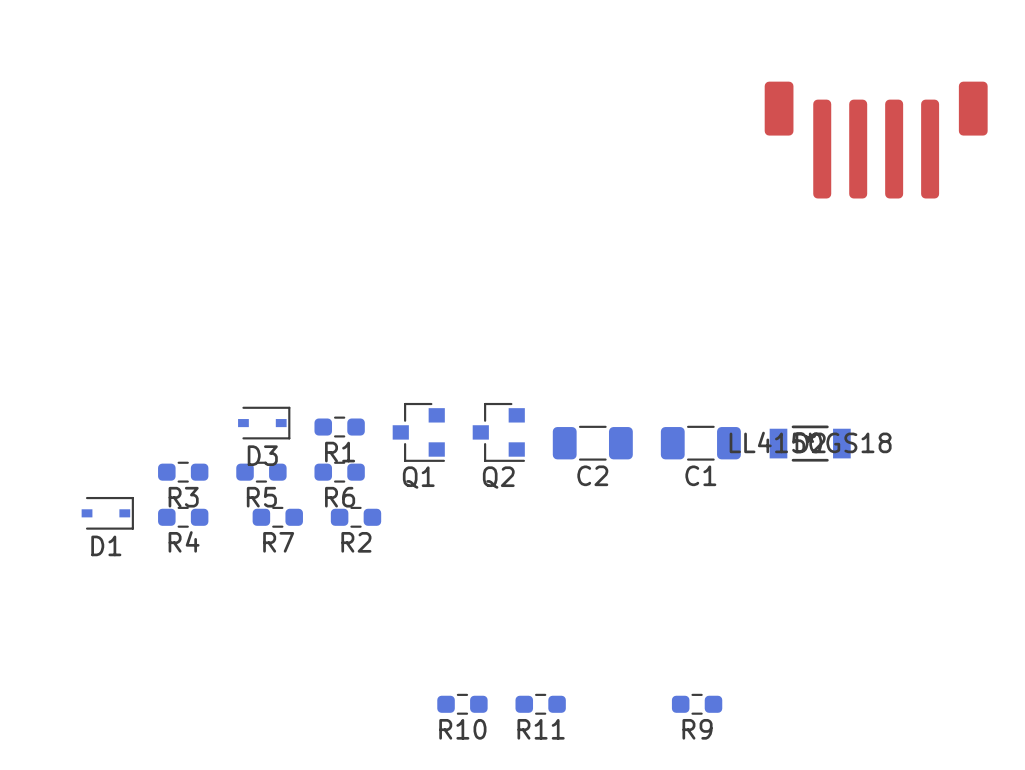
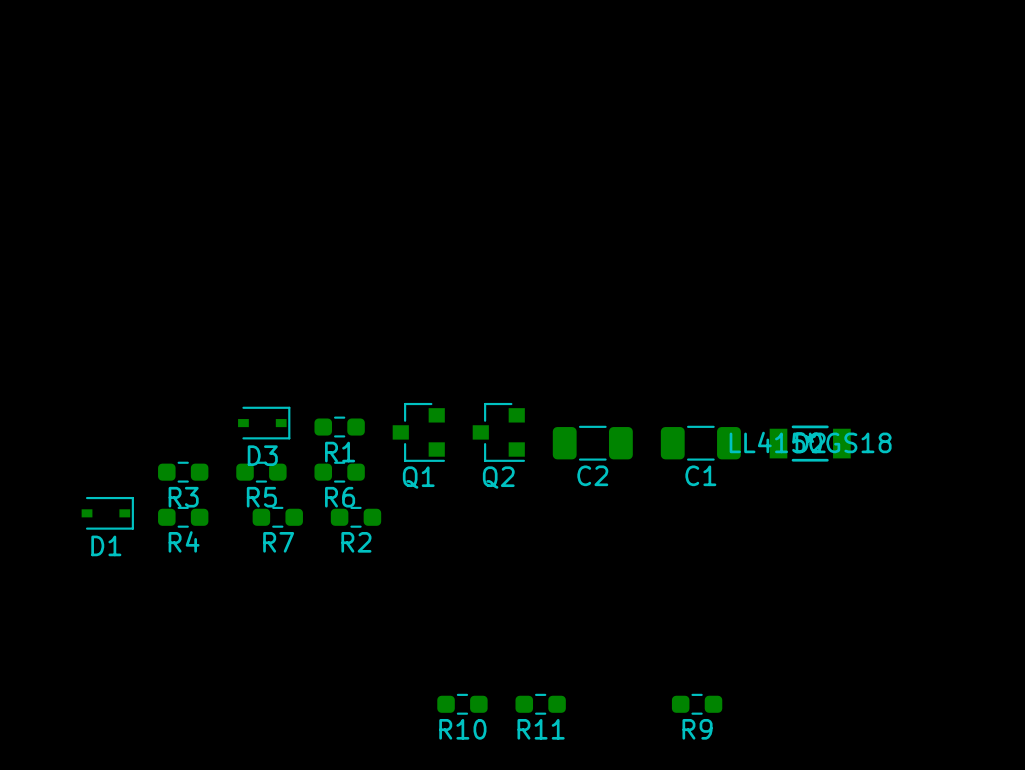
part: (876, 140) -> none

